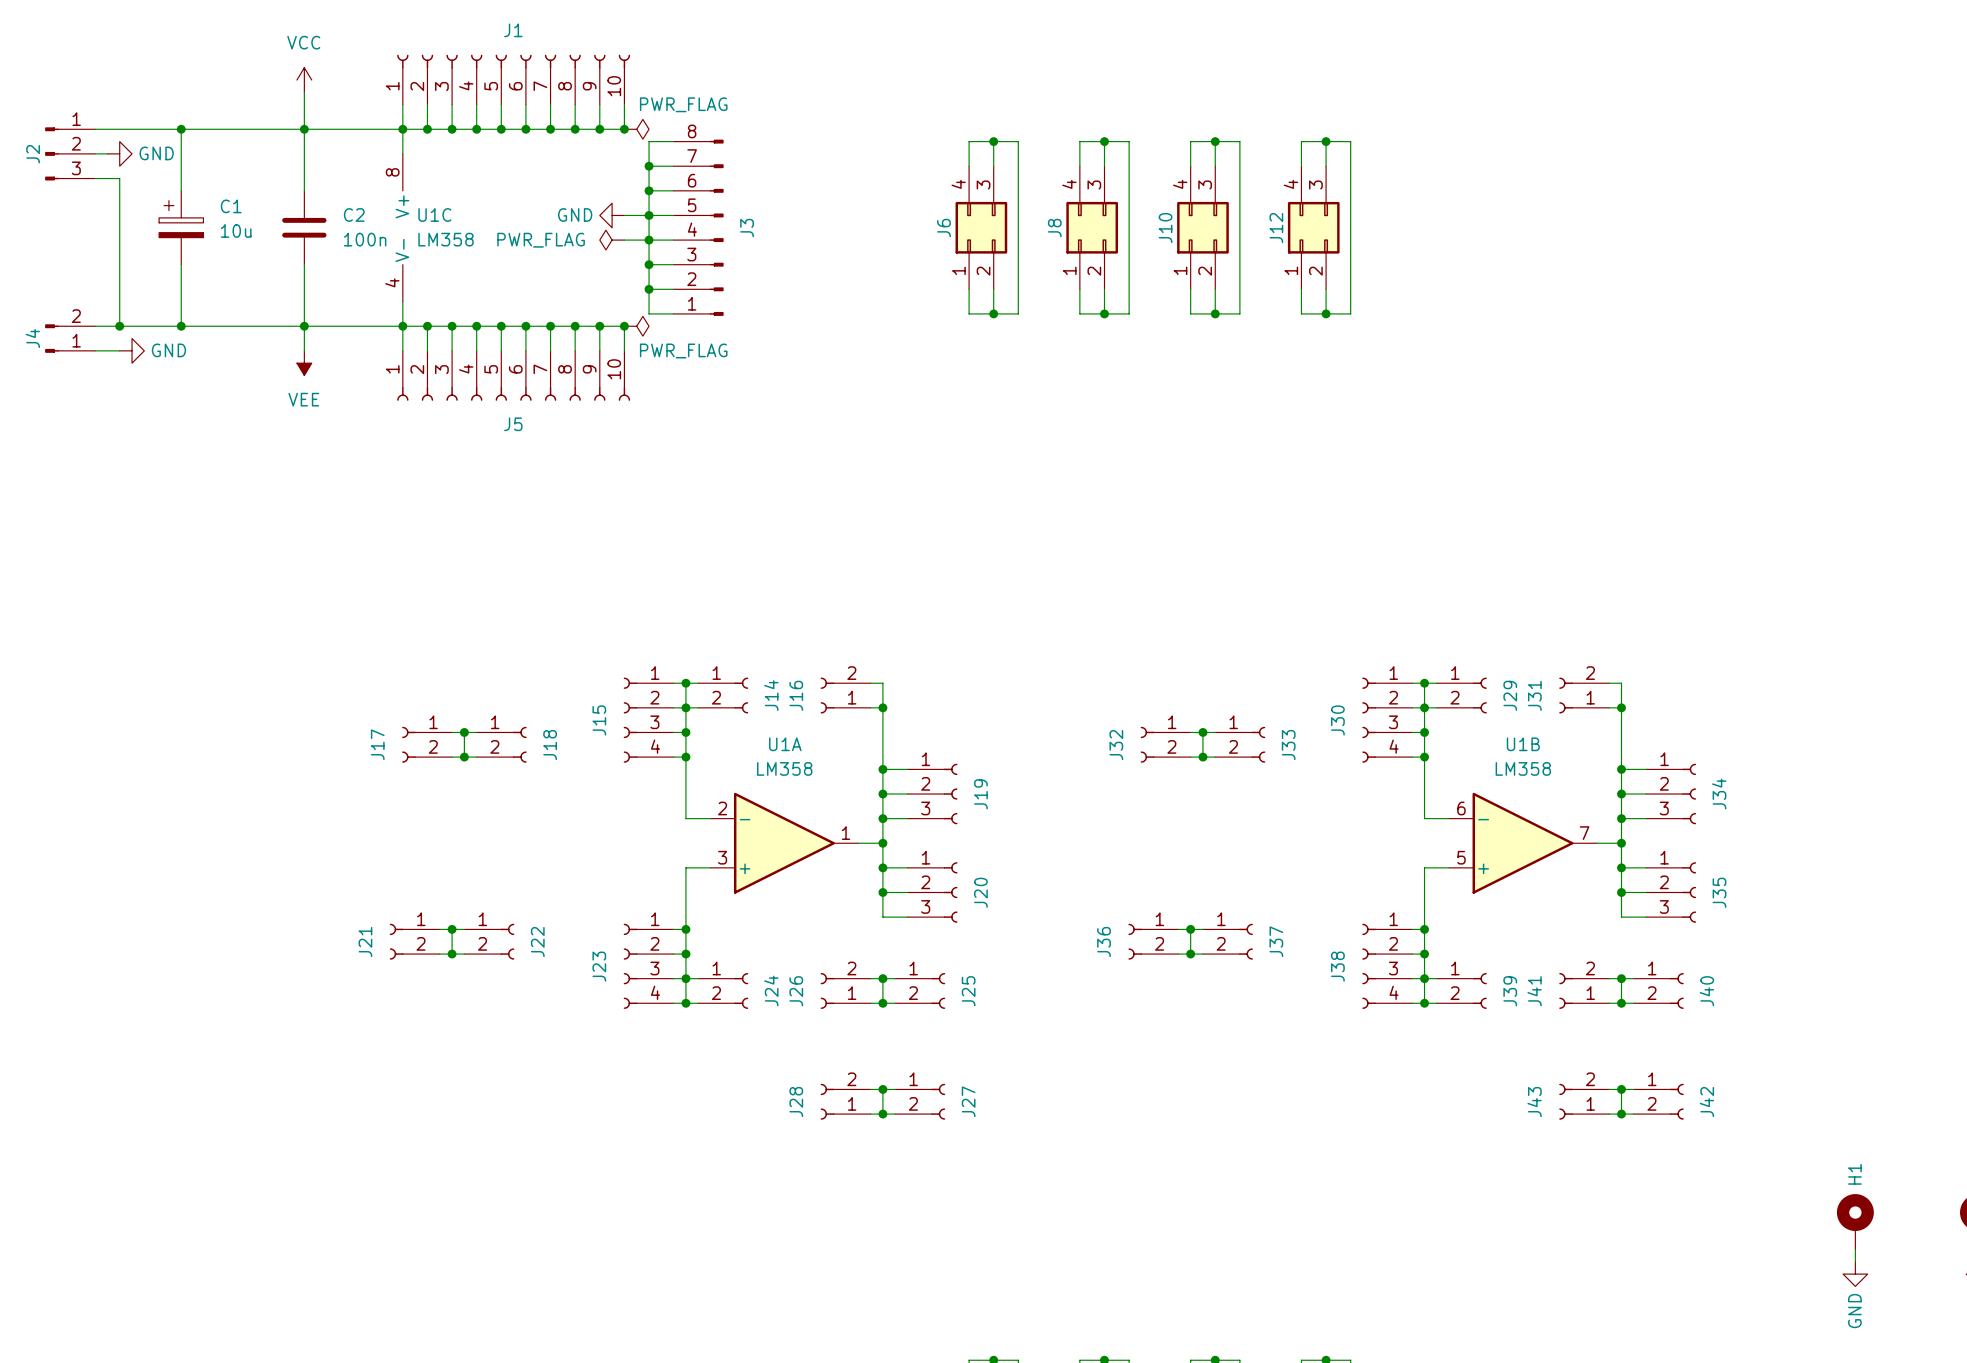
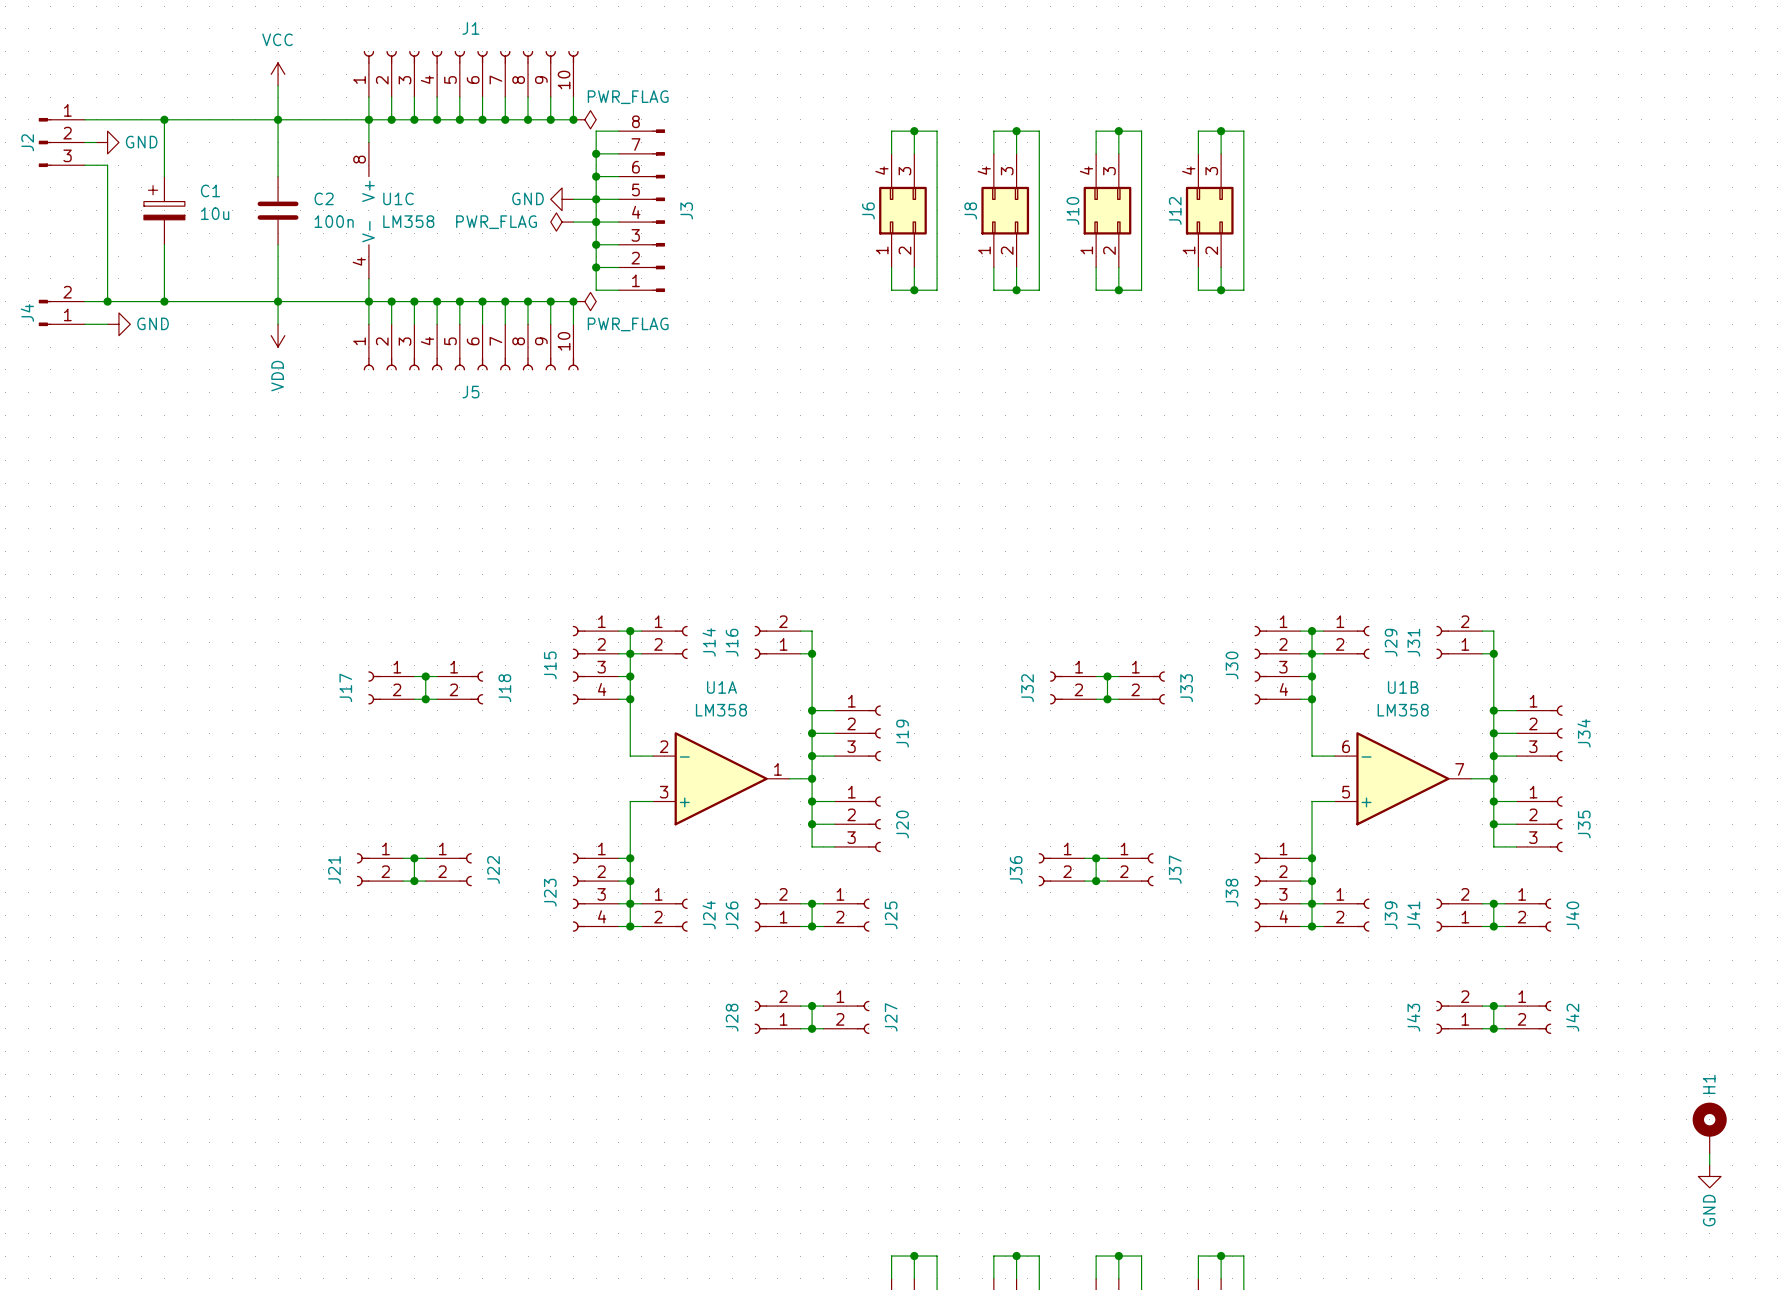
power symbol: VEE (304, 363) -> VDD (278, 335)

